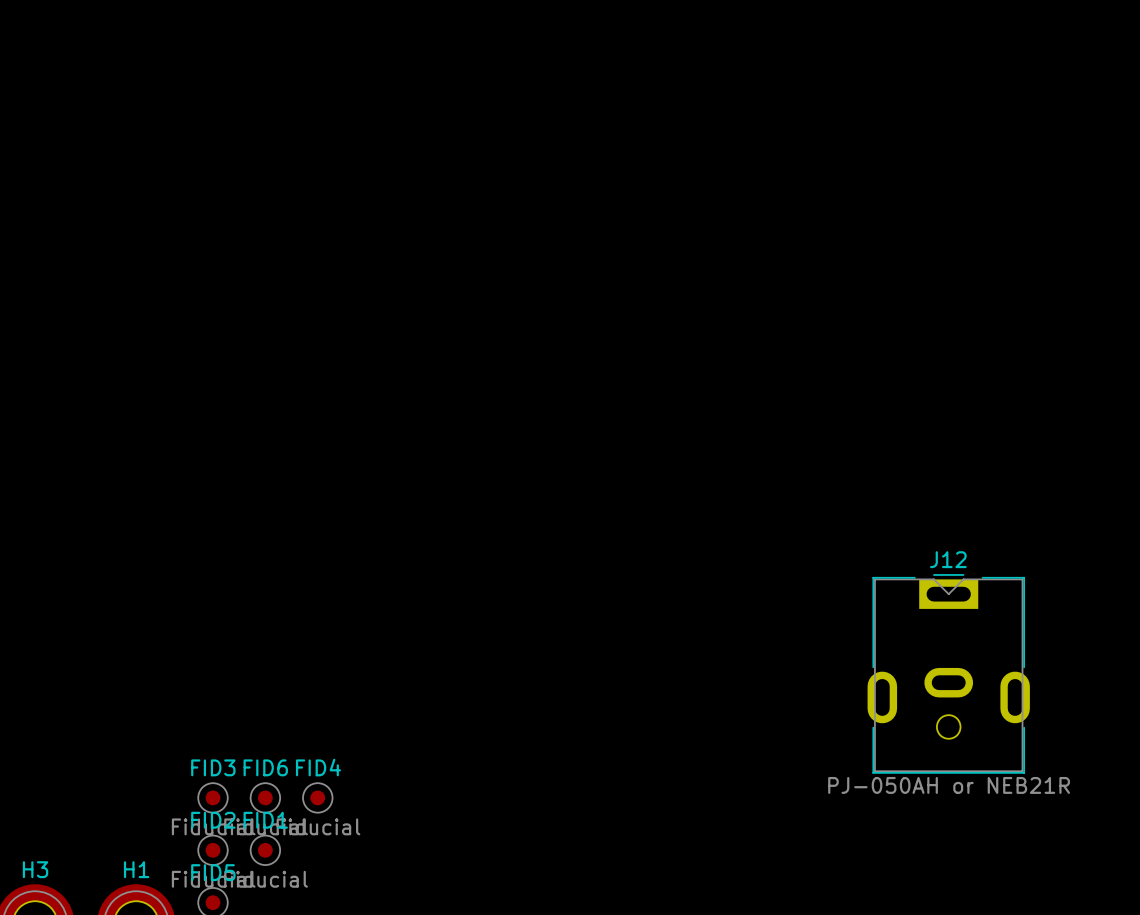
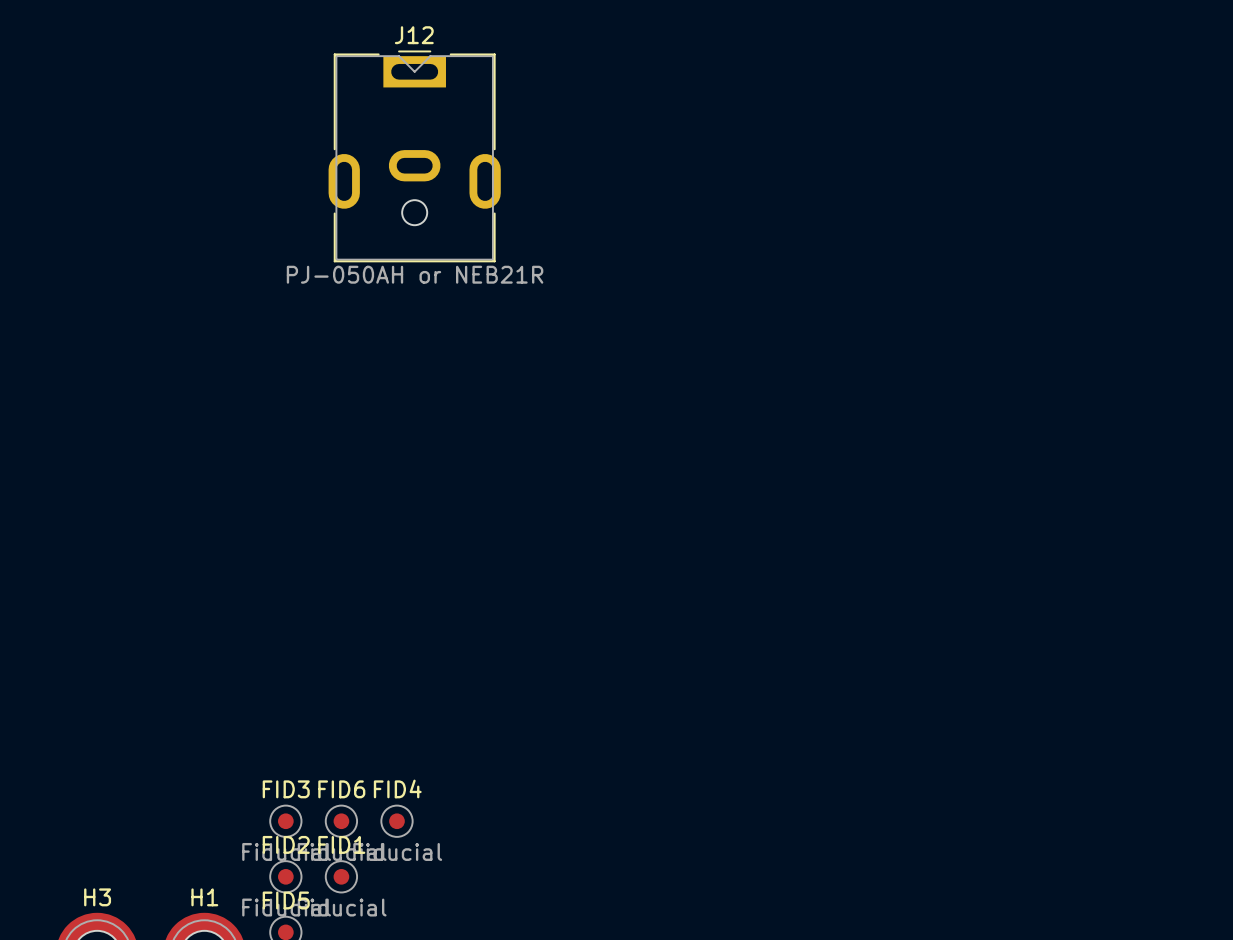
J12 position: (948, 673) -> (414, 156)

